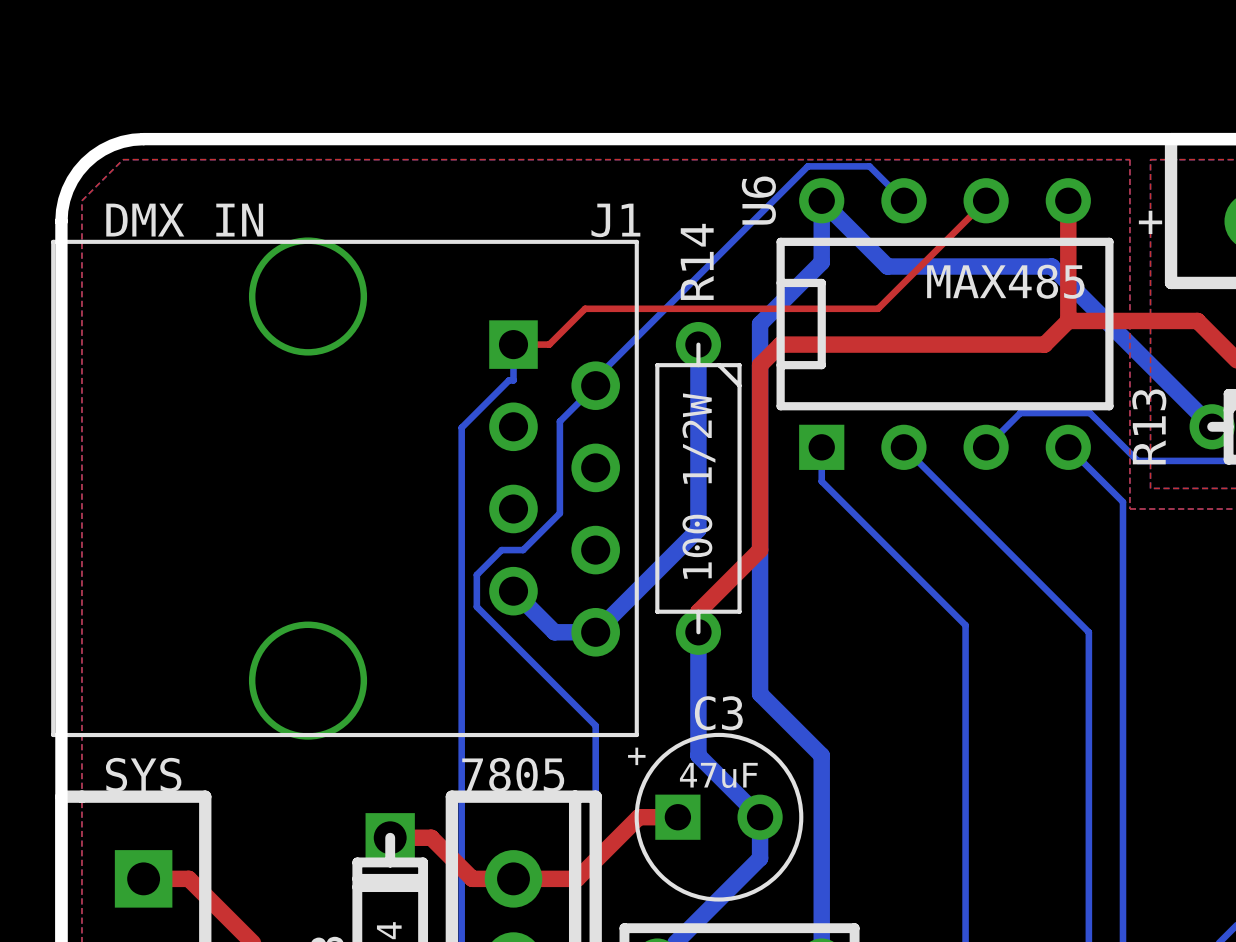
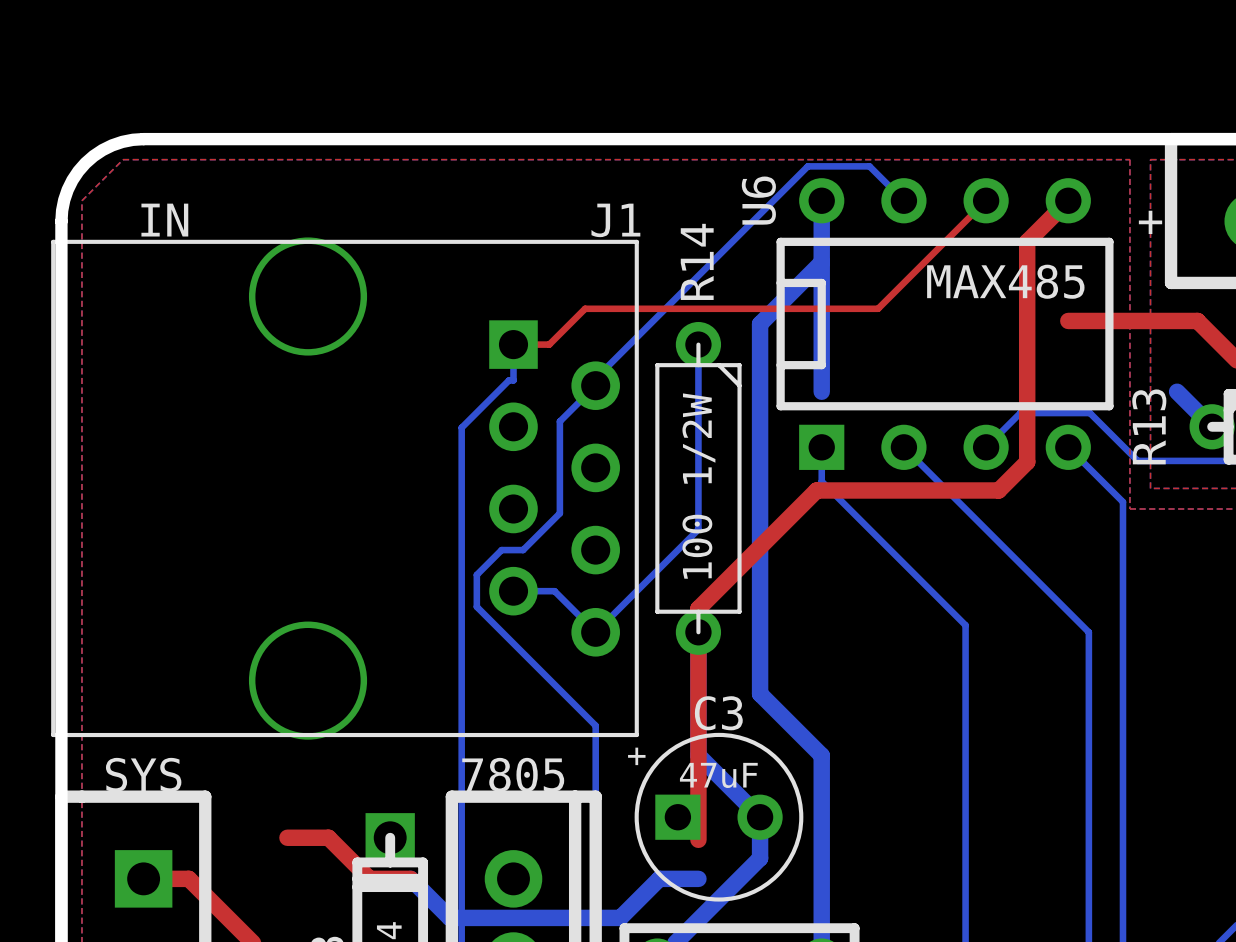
bottom track: (821, 200) (887, 266) (1051, 266) (1177, 391) -> none
top track: (1068, 200) (1068, 320) (1044, 344) (780, 344) (760, 365) (760, 550) (698, 611) -> (1068, 200) (1027, 241) (1027, 462) (998, 490) (816, 490) (698, 608) (698, 611)
J1 value: DMX IN (184, 220) -> IN (164, 220)
bottom track: none -> (821, 262) (821, 391)
bottom track width: thick (698, 344) (698, 529) (595, 632) -> thin (698, 344) (698, 529) (595, 632)
bottom track: (513, 591) (554, 632) (595, 632) -> (513, 591) (554, 591) (595, 632)
top track: none -> (698, 632) (698, 839)
top track: (677, 817) (638, 817) (577, 878) (472, 878) (431, 837) (390, 837) -> none
top track: none -> (287, 837) (328, 837) (369, 878) (410, 878)
bottom track: none -> (410, 878) (449, 917) (620, 917) (659, 878) (698, 878)

